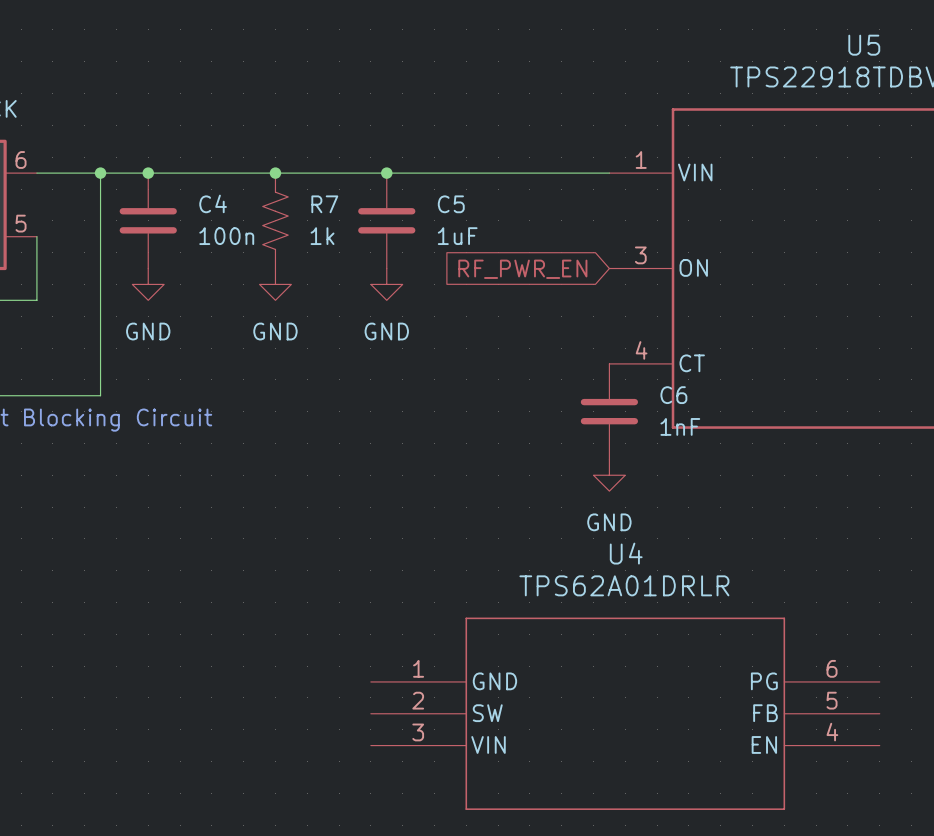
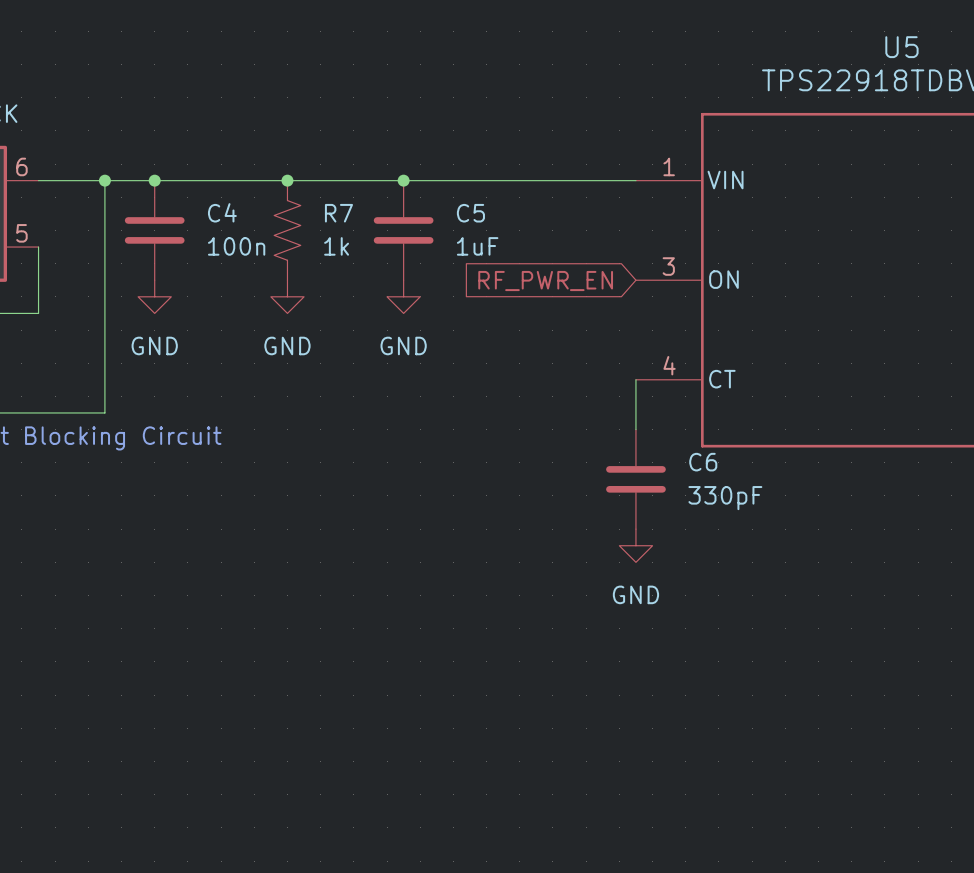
C6 position: (609, 411) -> (635, 479)
C6 value: 1nF (680, 426) -> 330pF (725, 498)
power symbol position: GND (609, 475) -> GND (635, 545)
U4: TPS62A01DRLR (625, 713) -> none

